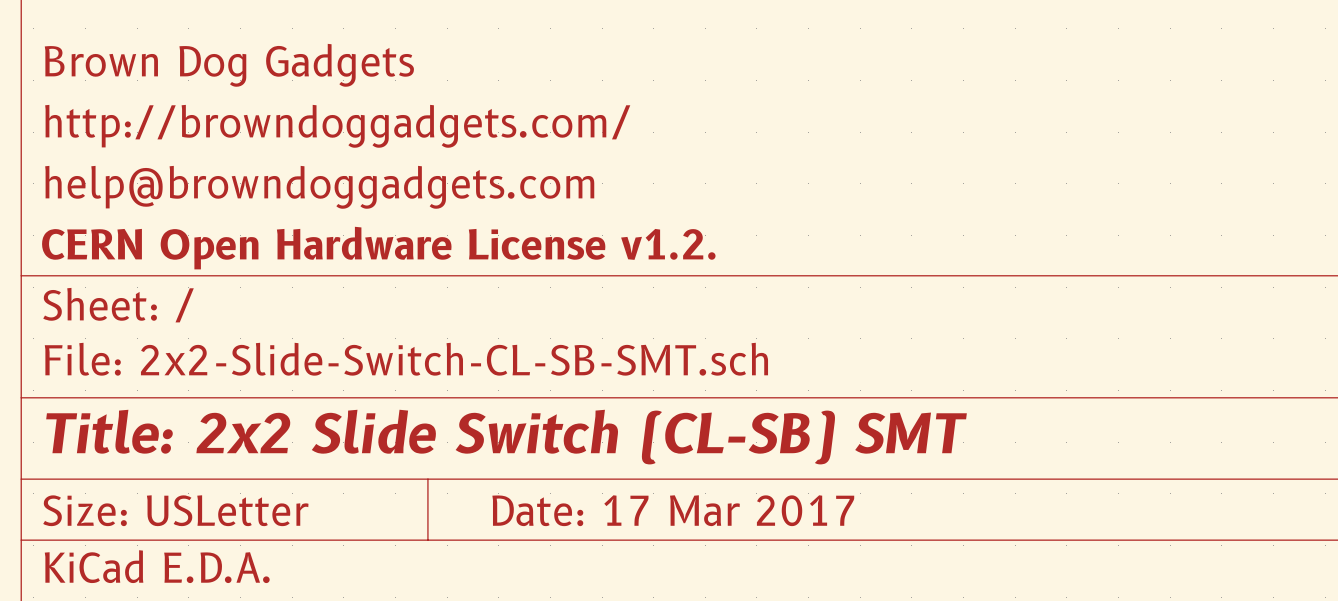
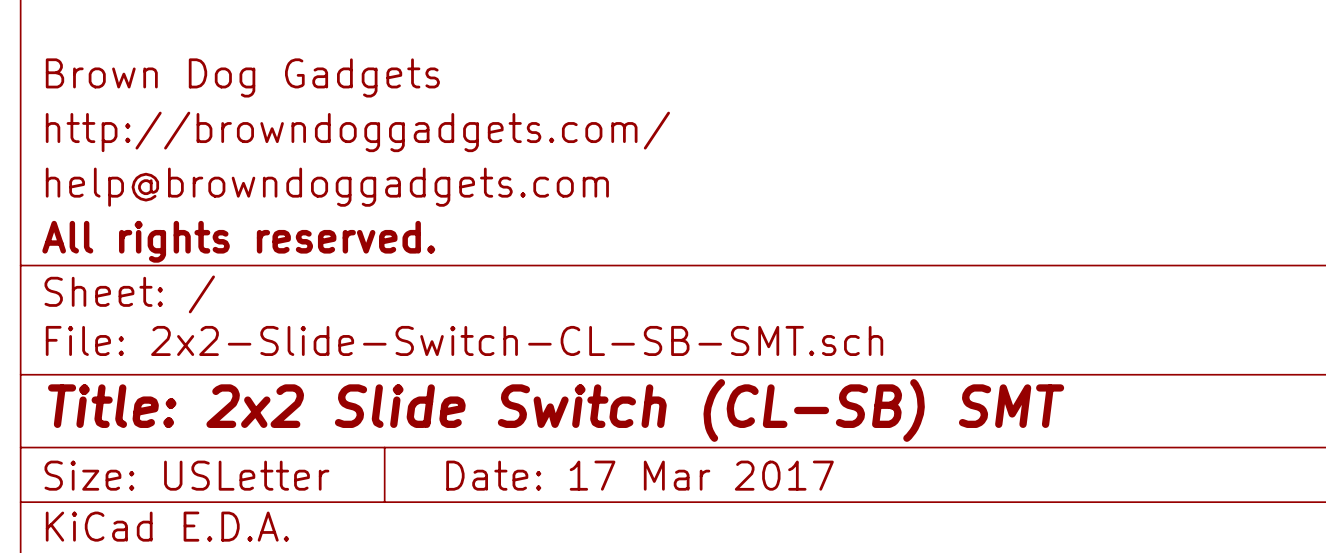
title block: CERN Open Hardware License v1.2. (378, 248) -> All rights reserved. (238, 241)

